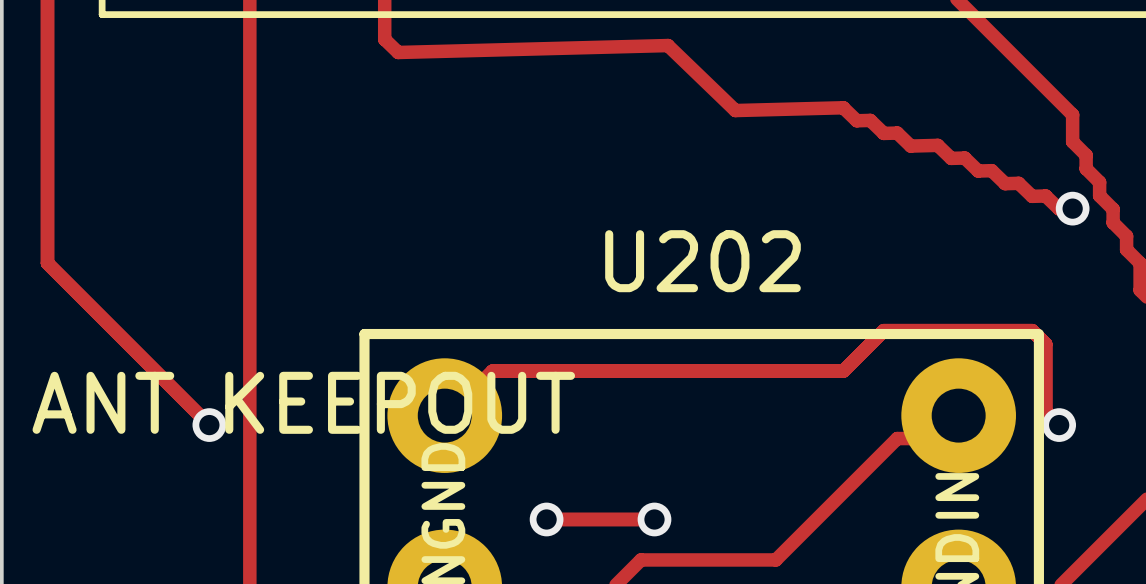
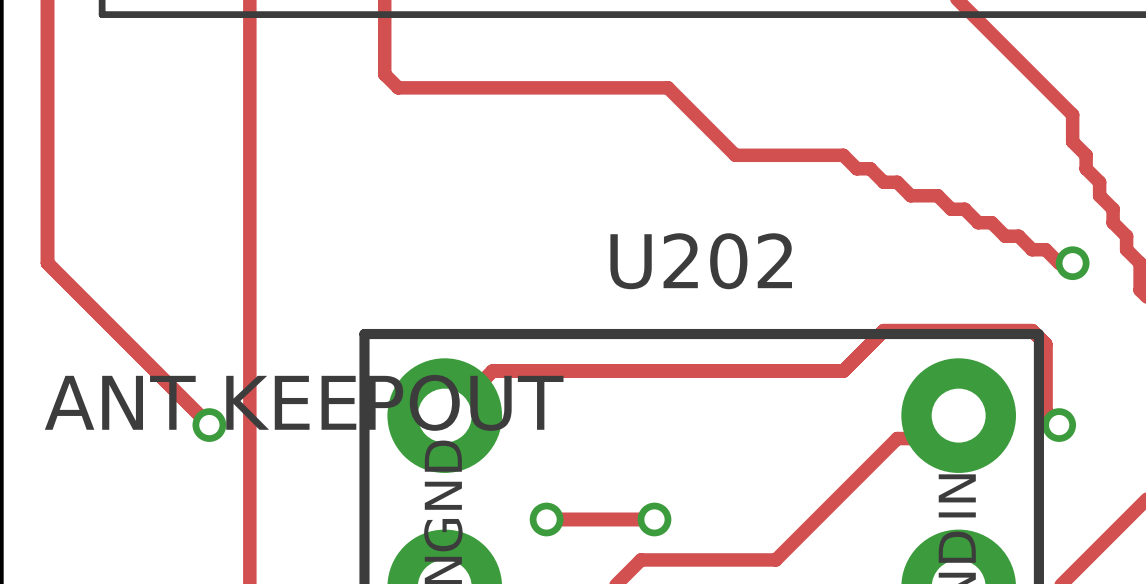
track: (384, 39) (398, 52) (667, 45) (735, 110) (843, 107) (856, 120) (870, 120) (883, 133) (897, 133) (910, 146) (937, 145) (951, 158) (964, 158) (978, 171) (991, 170) (1005, 183) (1018, 183) (1032, 196) (1045, 195) (1059, 208) (1072, 208) -> (384, 39) (384, 74) (398, 87) (667, 87) (735, 155) (843, 155) (856, 168) (870, 168) (883, 182) (897, 182) (910, 195) (937, 195) (951, 209) (964, 209) (978, 222) (991, 222) (1005, 236) (1018, 236) (1032, 249) (1045, 249) (1059, 263) (1072, 263)
via: (1072, 208) -> none
via: none -> (1072, 263)

